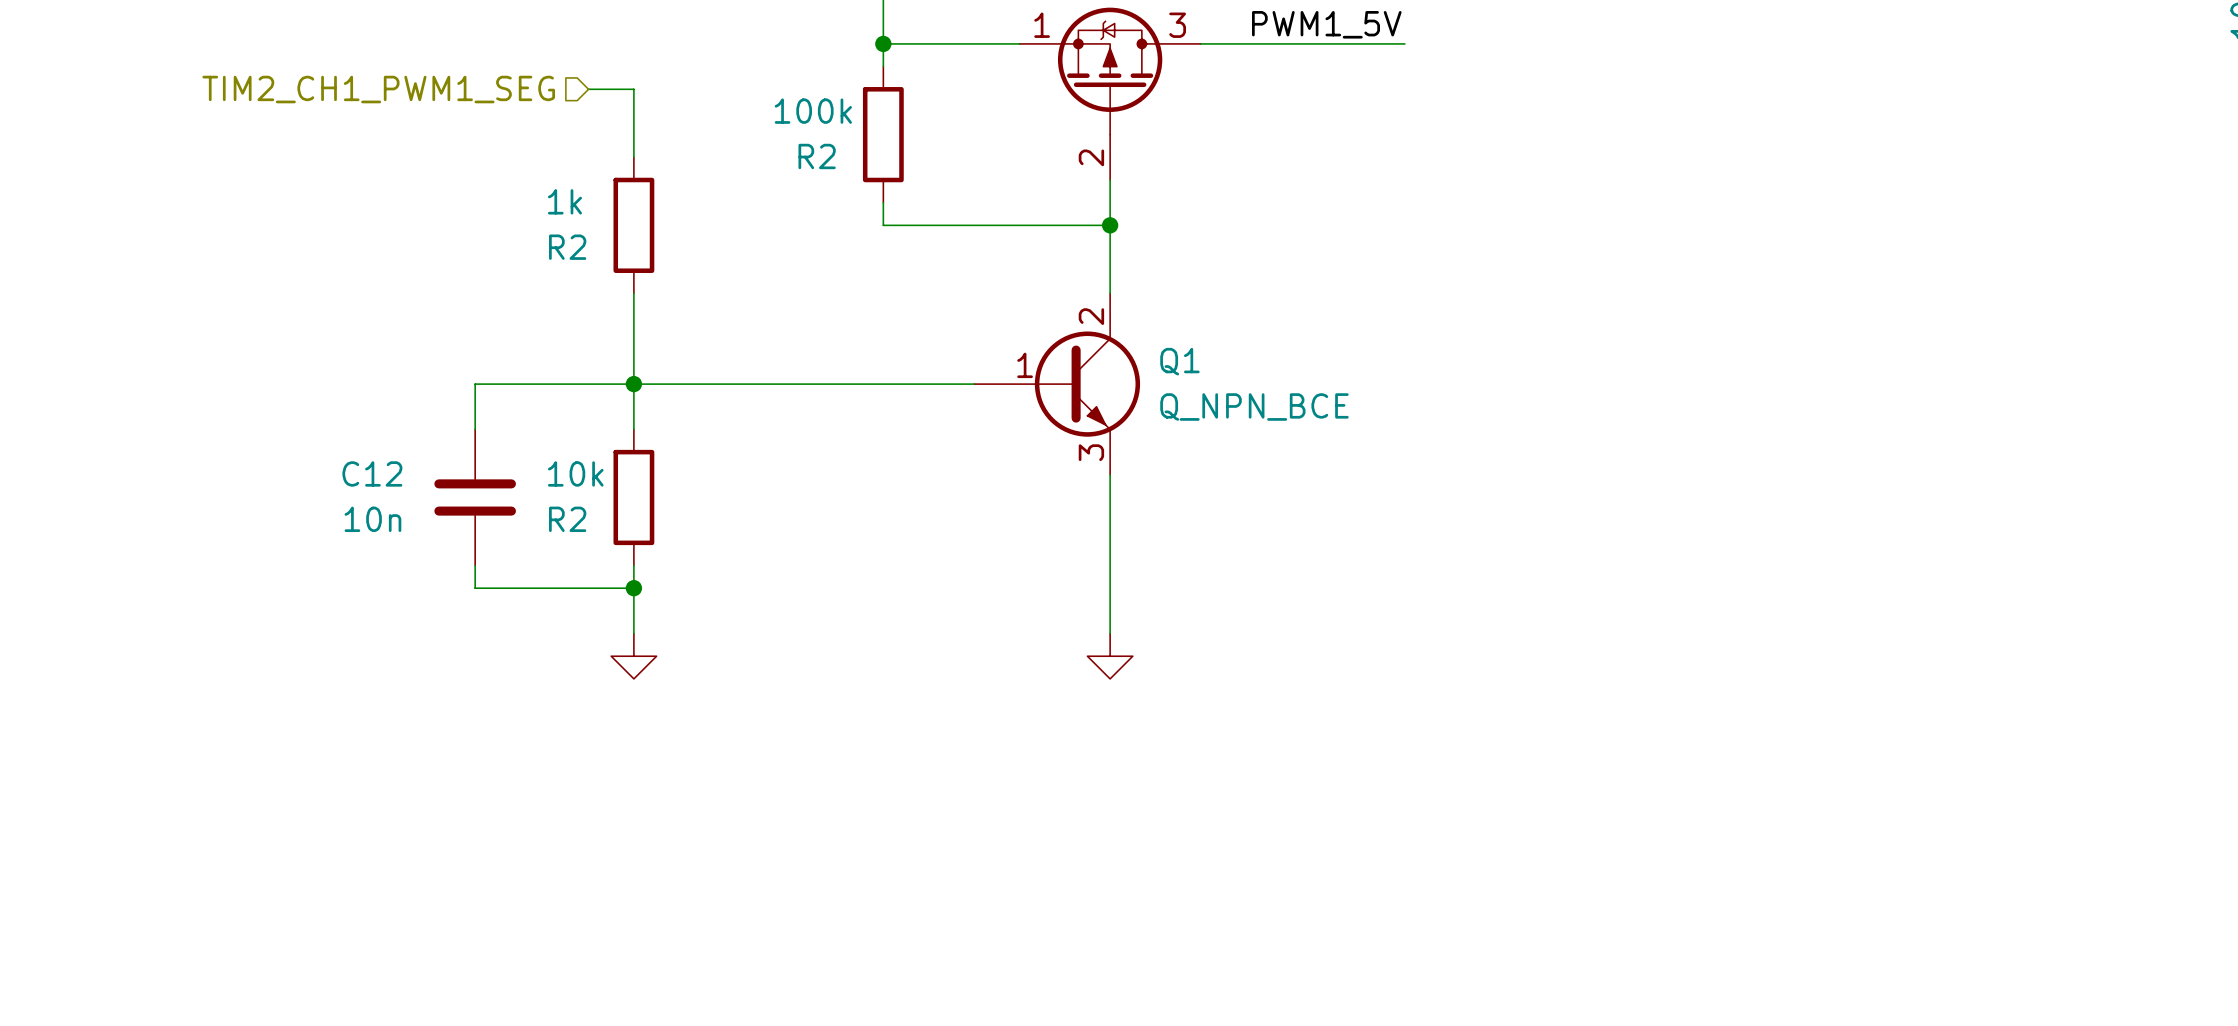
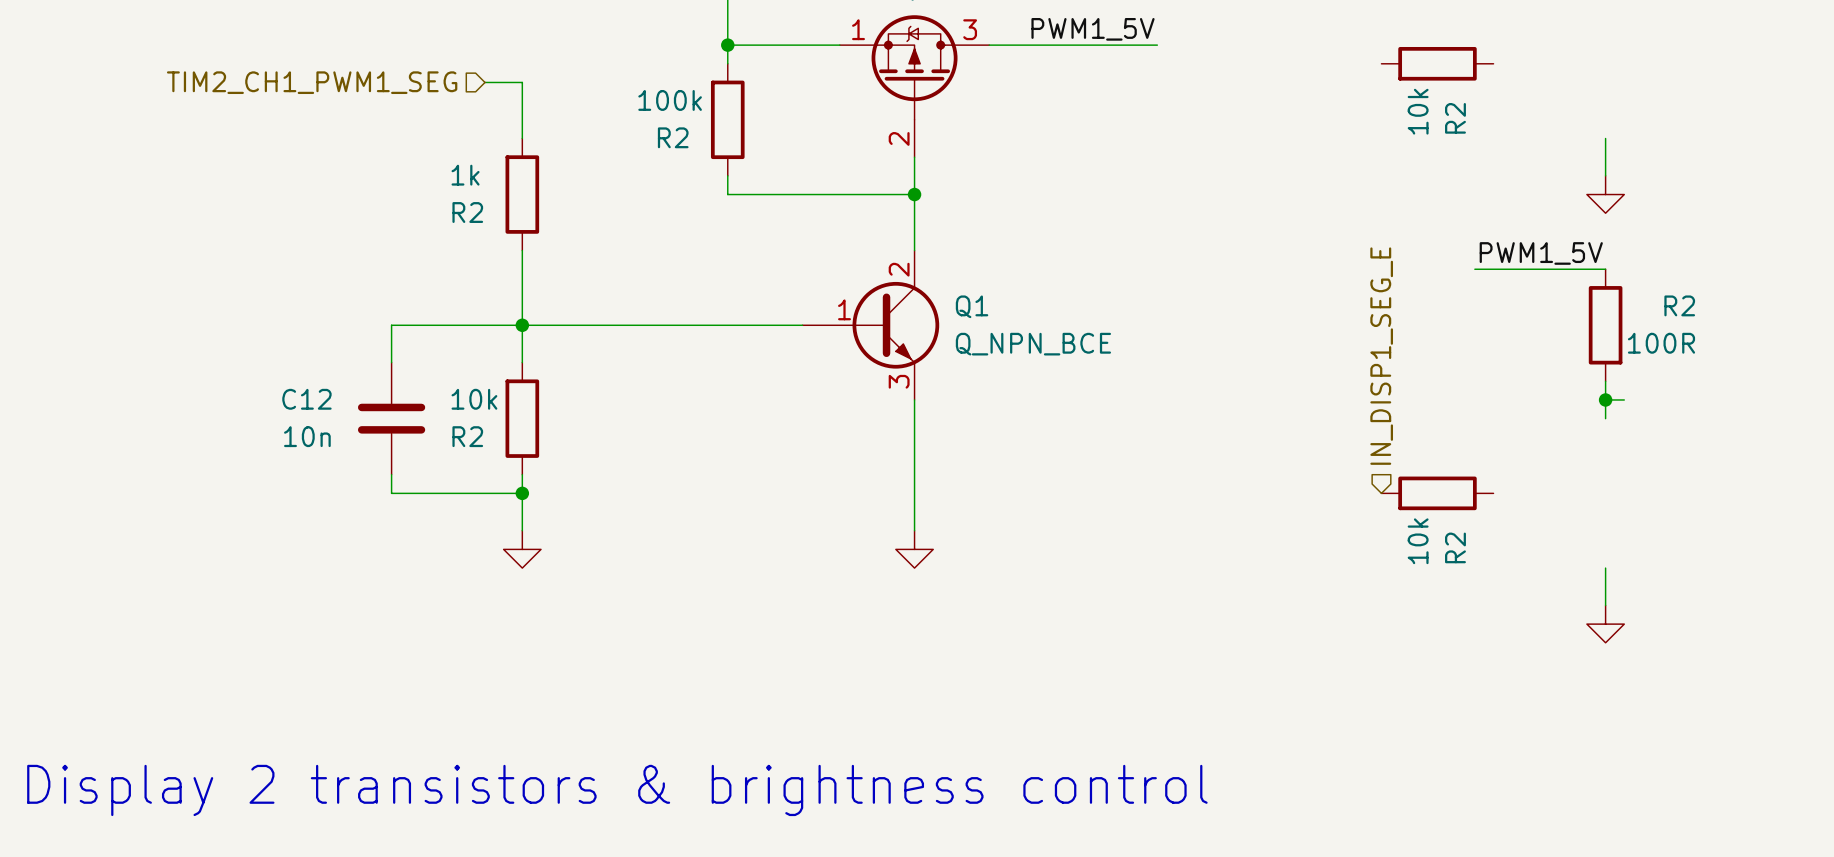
R2: none -> 10k (1437, 63)
wire: none -> (1605, 138) (1605, 175)
power symbol: none -> (1605, 194)
label: none -> PWM1_5V (1541, 253)
wire: none -> (1474, 269) (1605, 269)
R2: none -> 100R (1605, 325)
hierarchical label: none -> IN_DISP1_SEG_E (1381, 356)
wire: none -> (1605, 381) (1605, 418)
wire: none -> (1605, 399) (1624, 399)
junction: none -> (1605, 399)
R2: none -> 10k (1437, 493)
wire: none -> (1605, 568) (1605, 605)
power symbol: none -> (1605, 624)
text: none -> Display 2 transistors & brightness control (617, 790)

